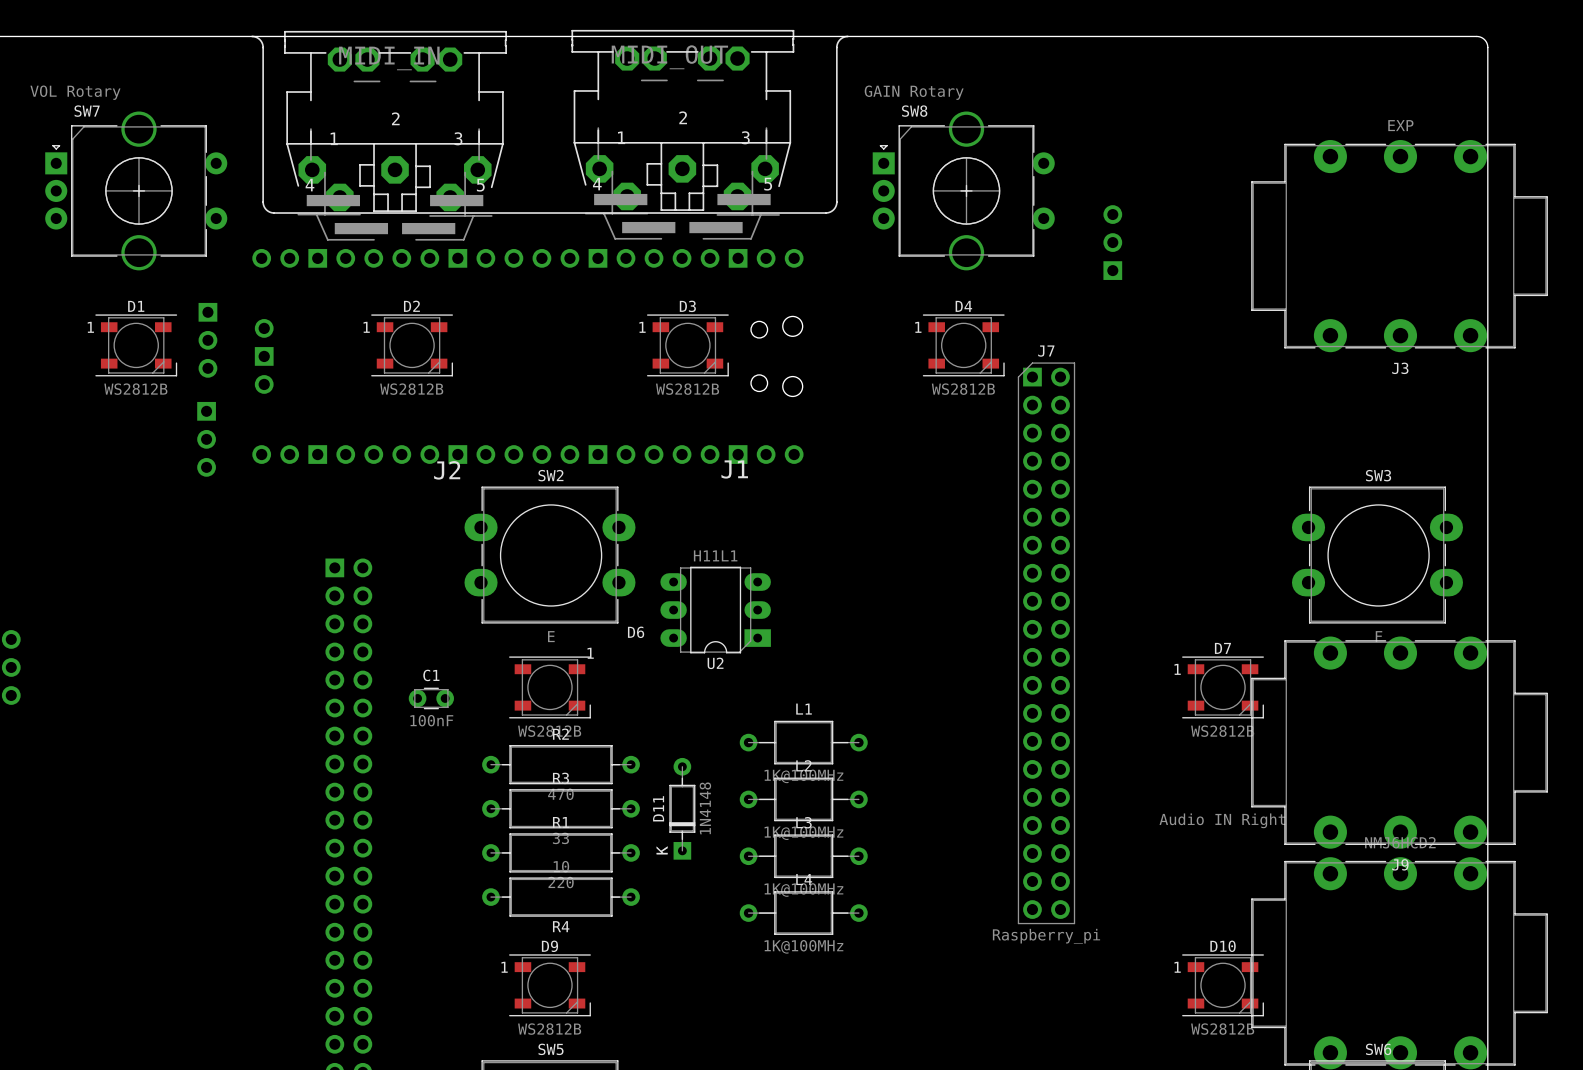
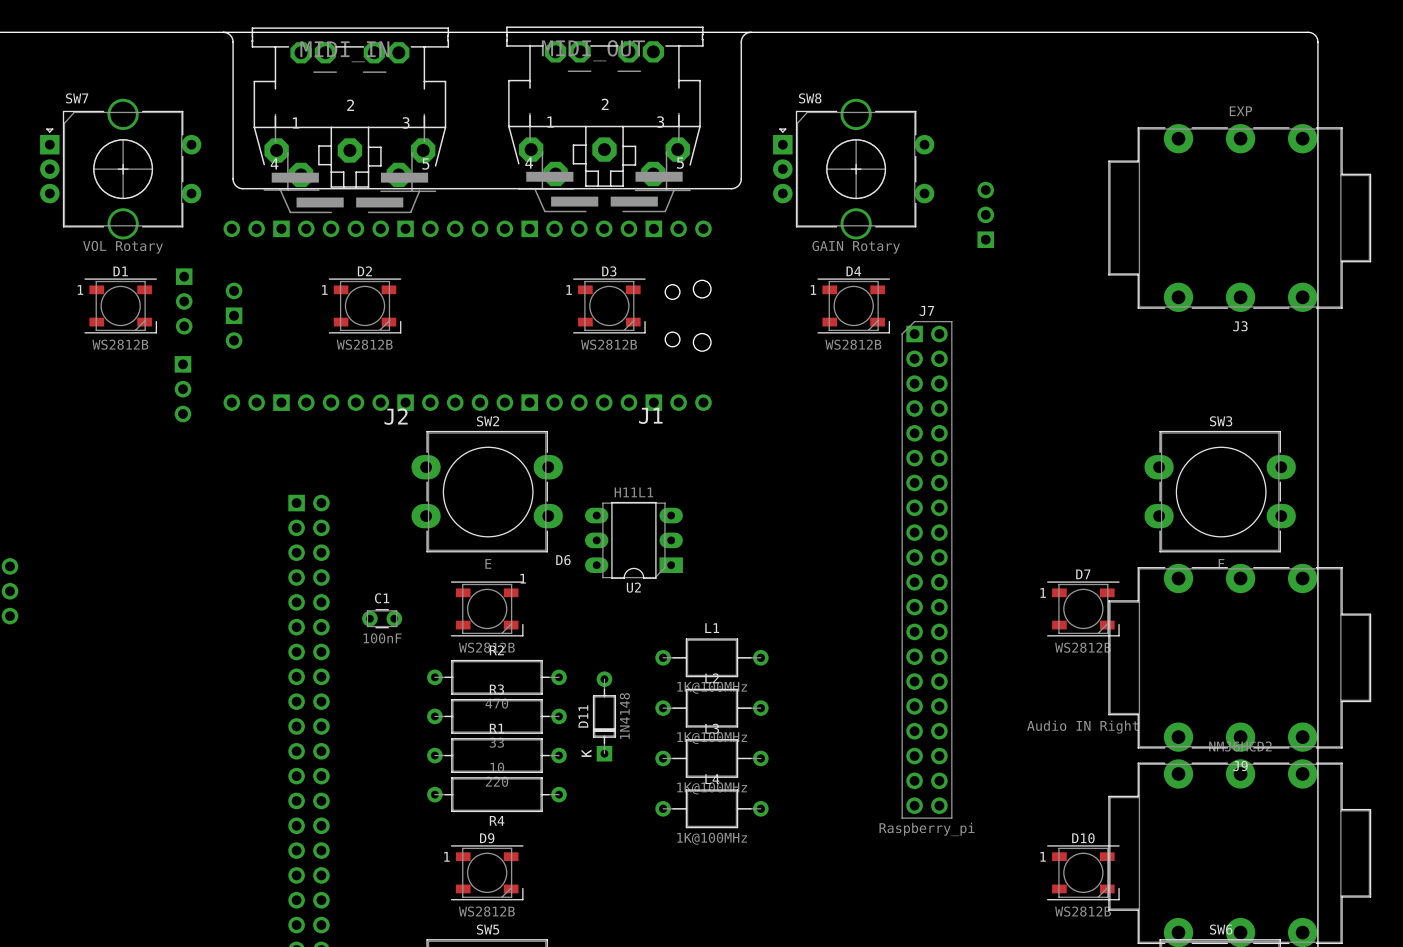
SW7 value position: VOL Rotary (75, 92) -> VOL Rotary (123, 247)
SW8 value position: GAIN Rotary (914, 92) -> GAIN Rotary (856, 247)

